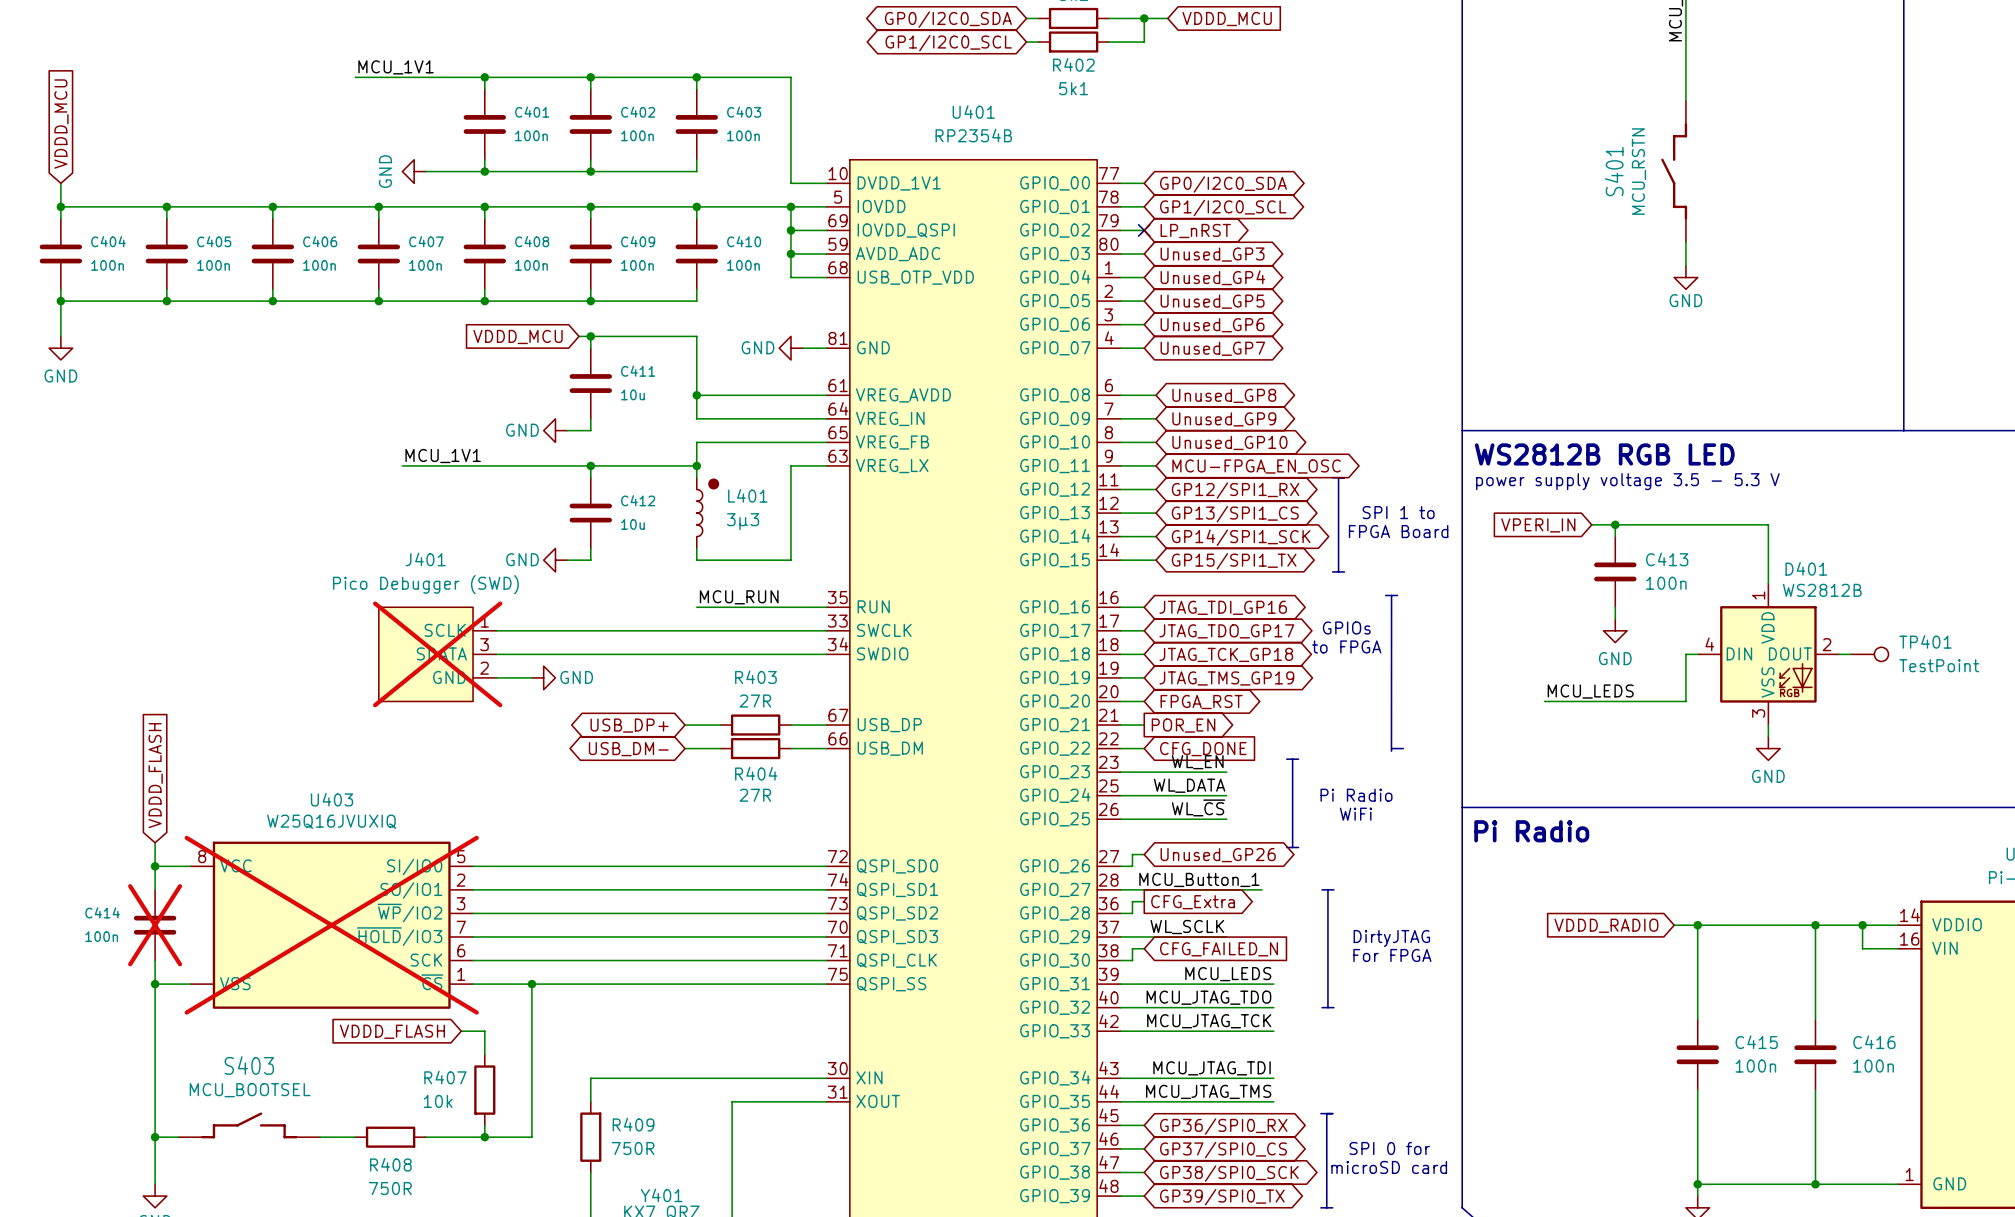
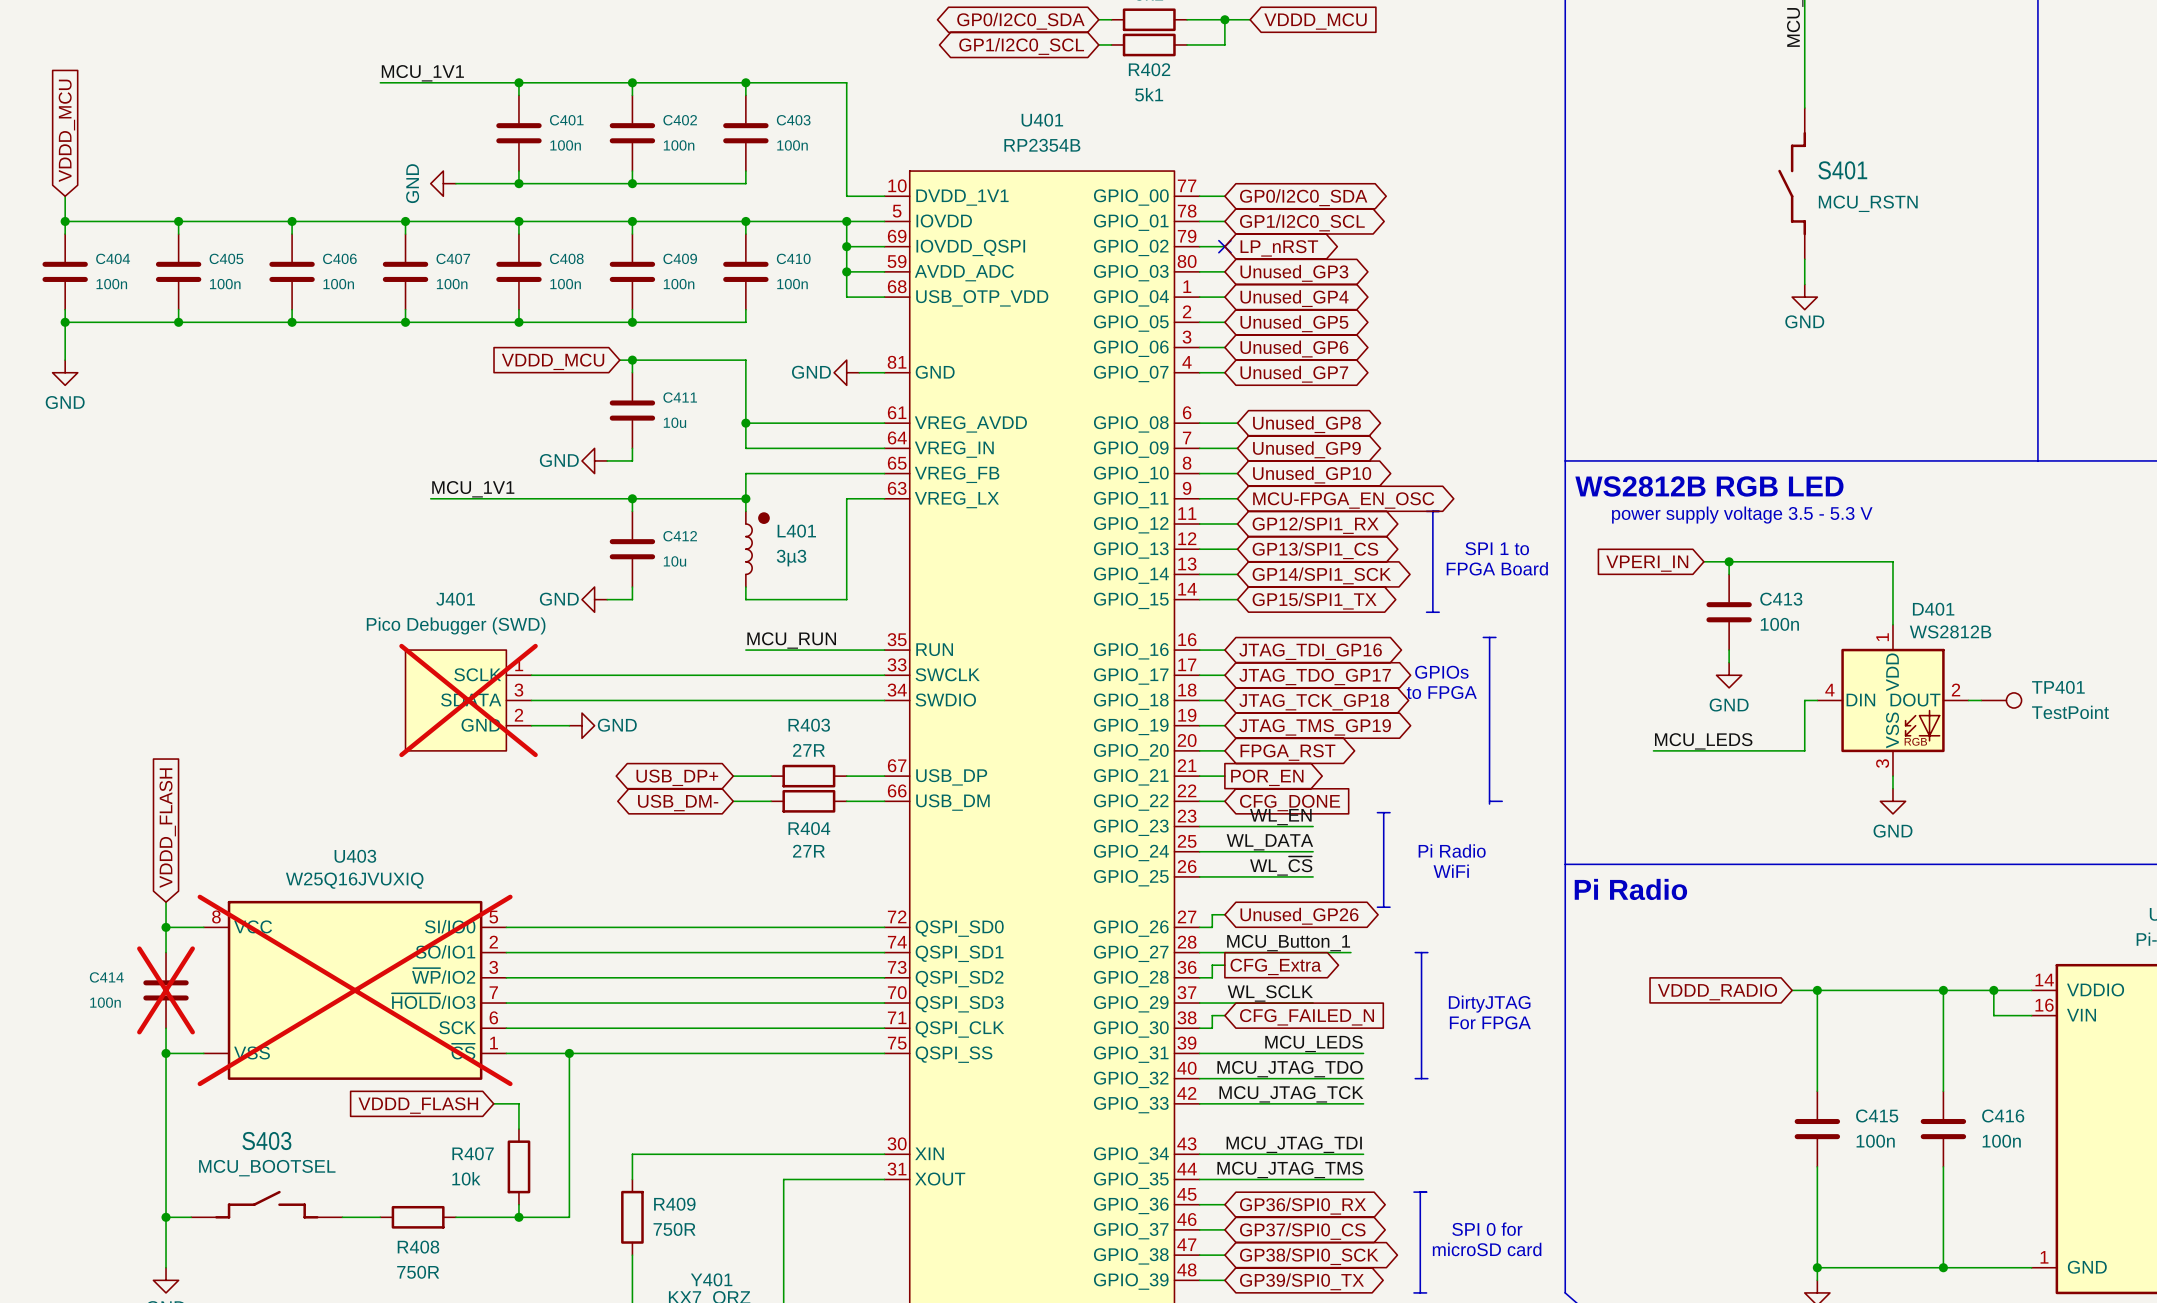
S401 name rotation: 0° (1614, 171) -> 90° clockwise (1842, 170)
S401 name position: S401 (1614, 171) -> S401 (1842, 170)
S401 value rotation: 0° (1638, 171) -> 90° clockwise (1868, 203)
S401 value position: MCU_RSTN (1638, 171) -> MCU_RSTN (1868, 203)

